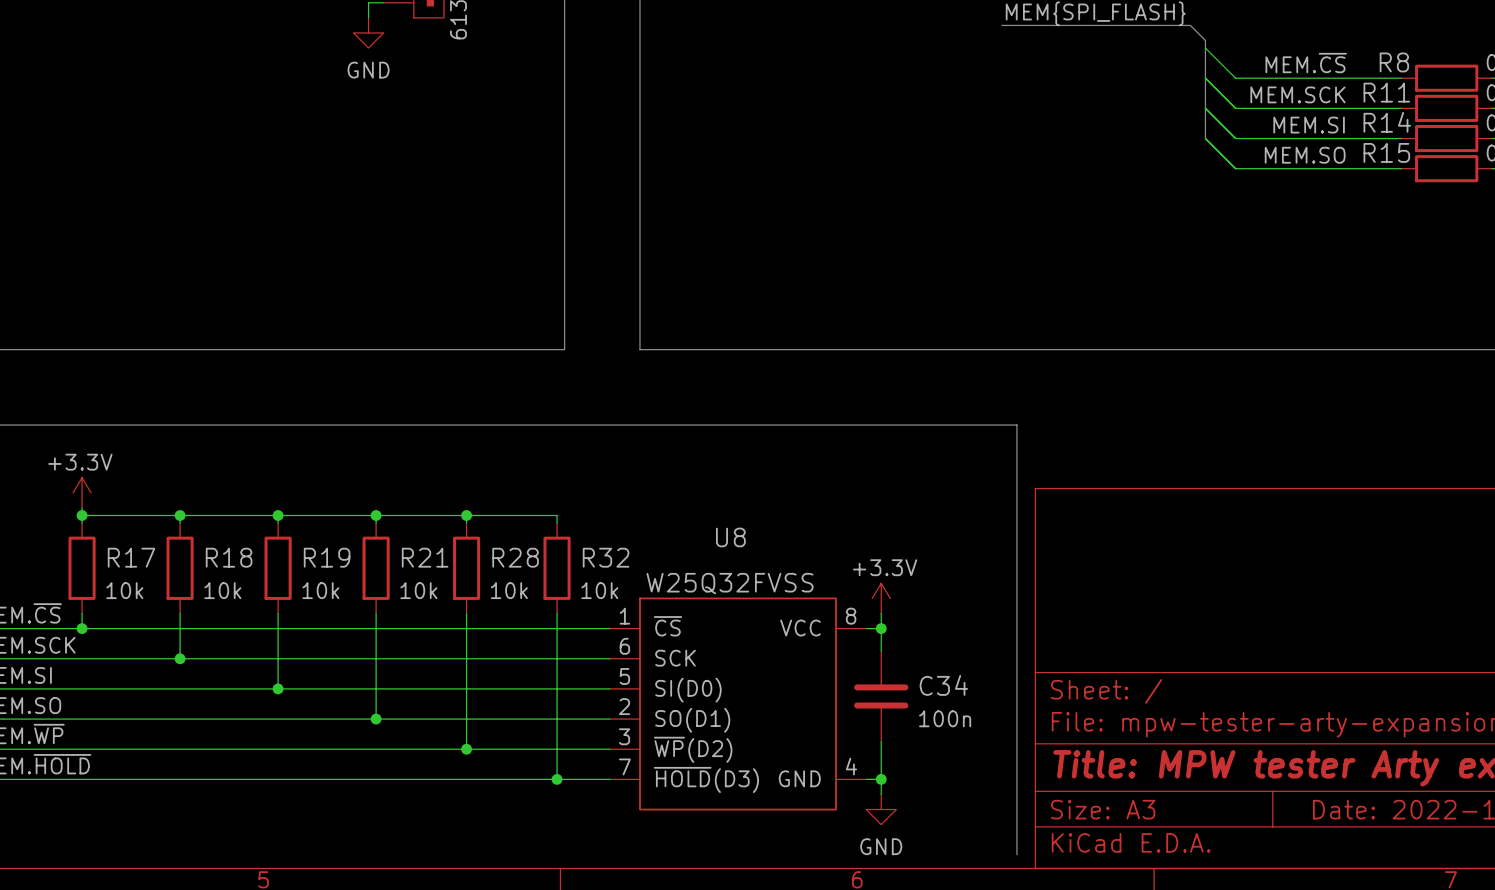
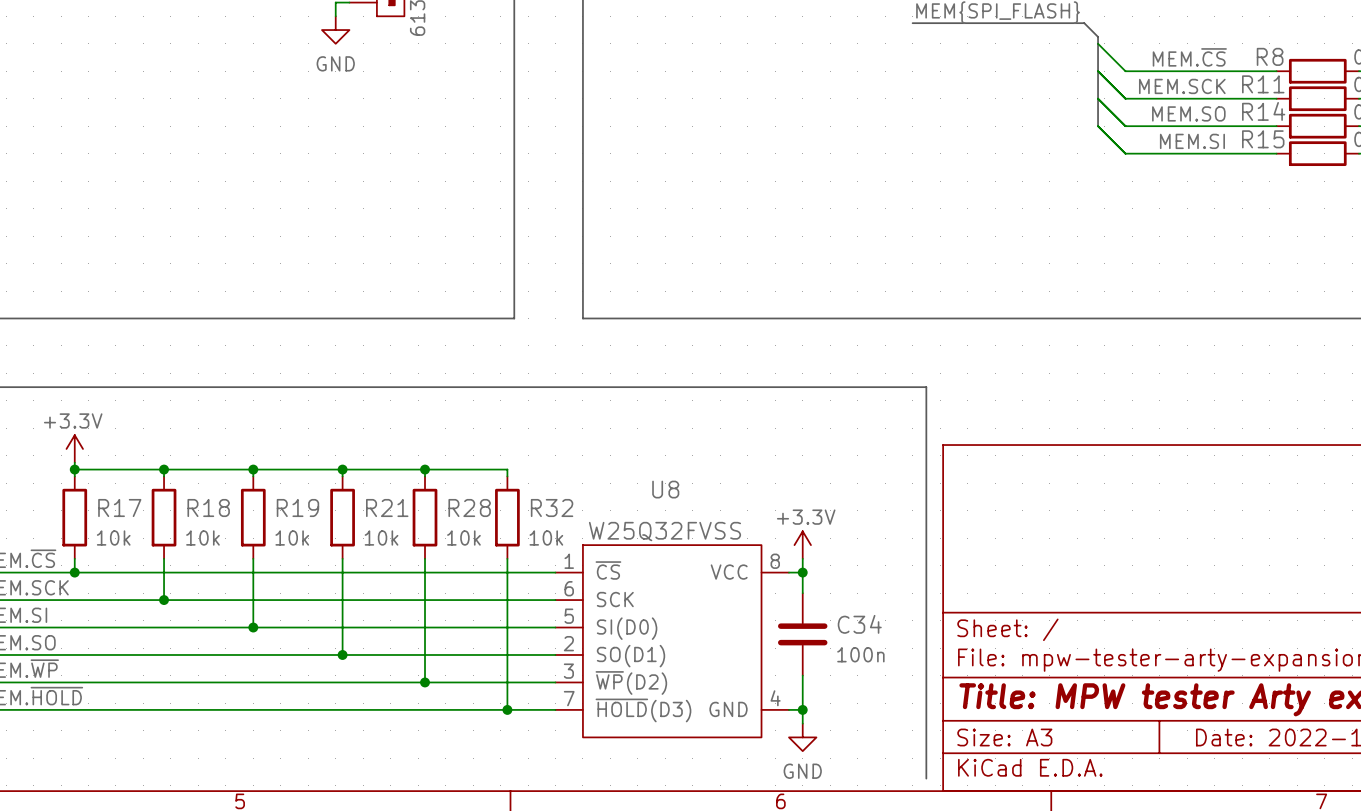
label: MEM.SI (1309, 125) -> MEM.SO (1188, 113)
label: MEM.SO (1305, 155) -> MEM.SI (1192, 141)

